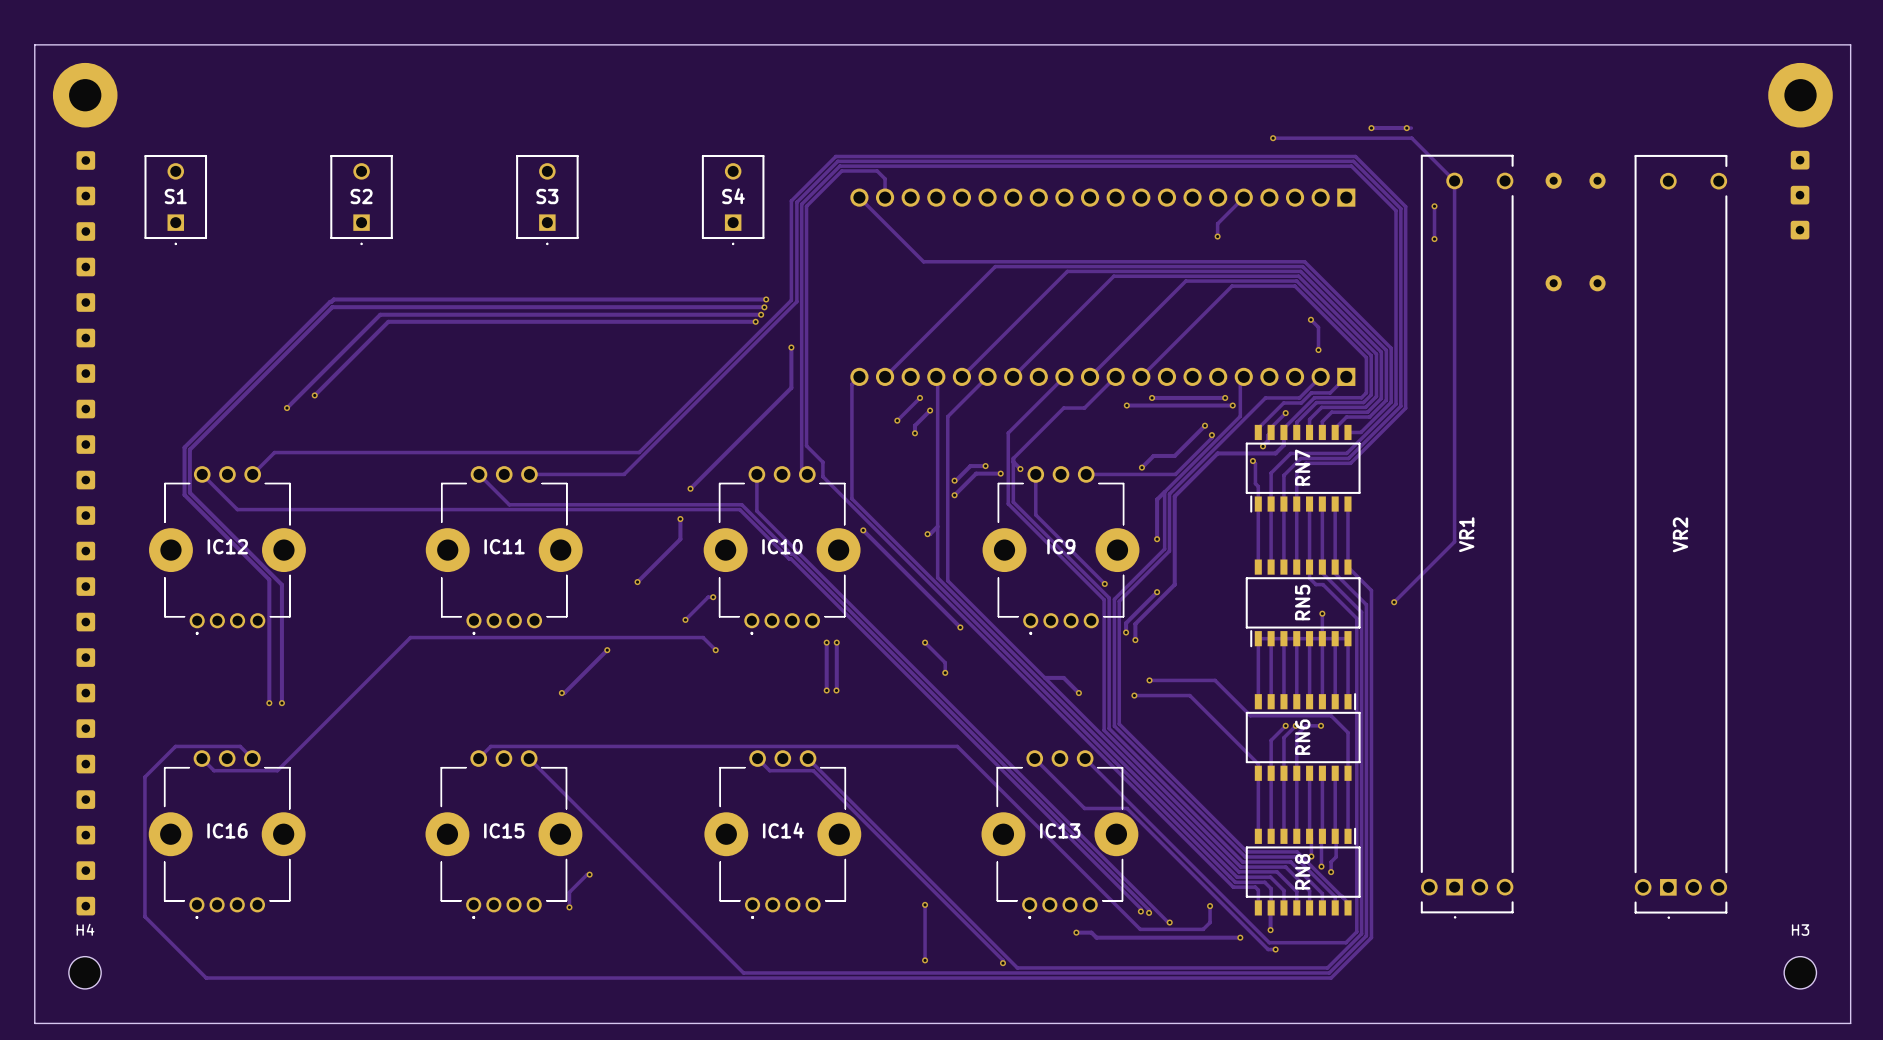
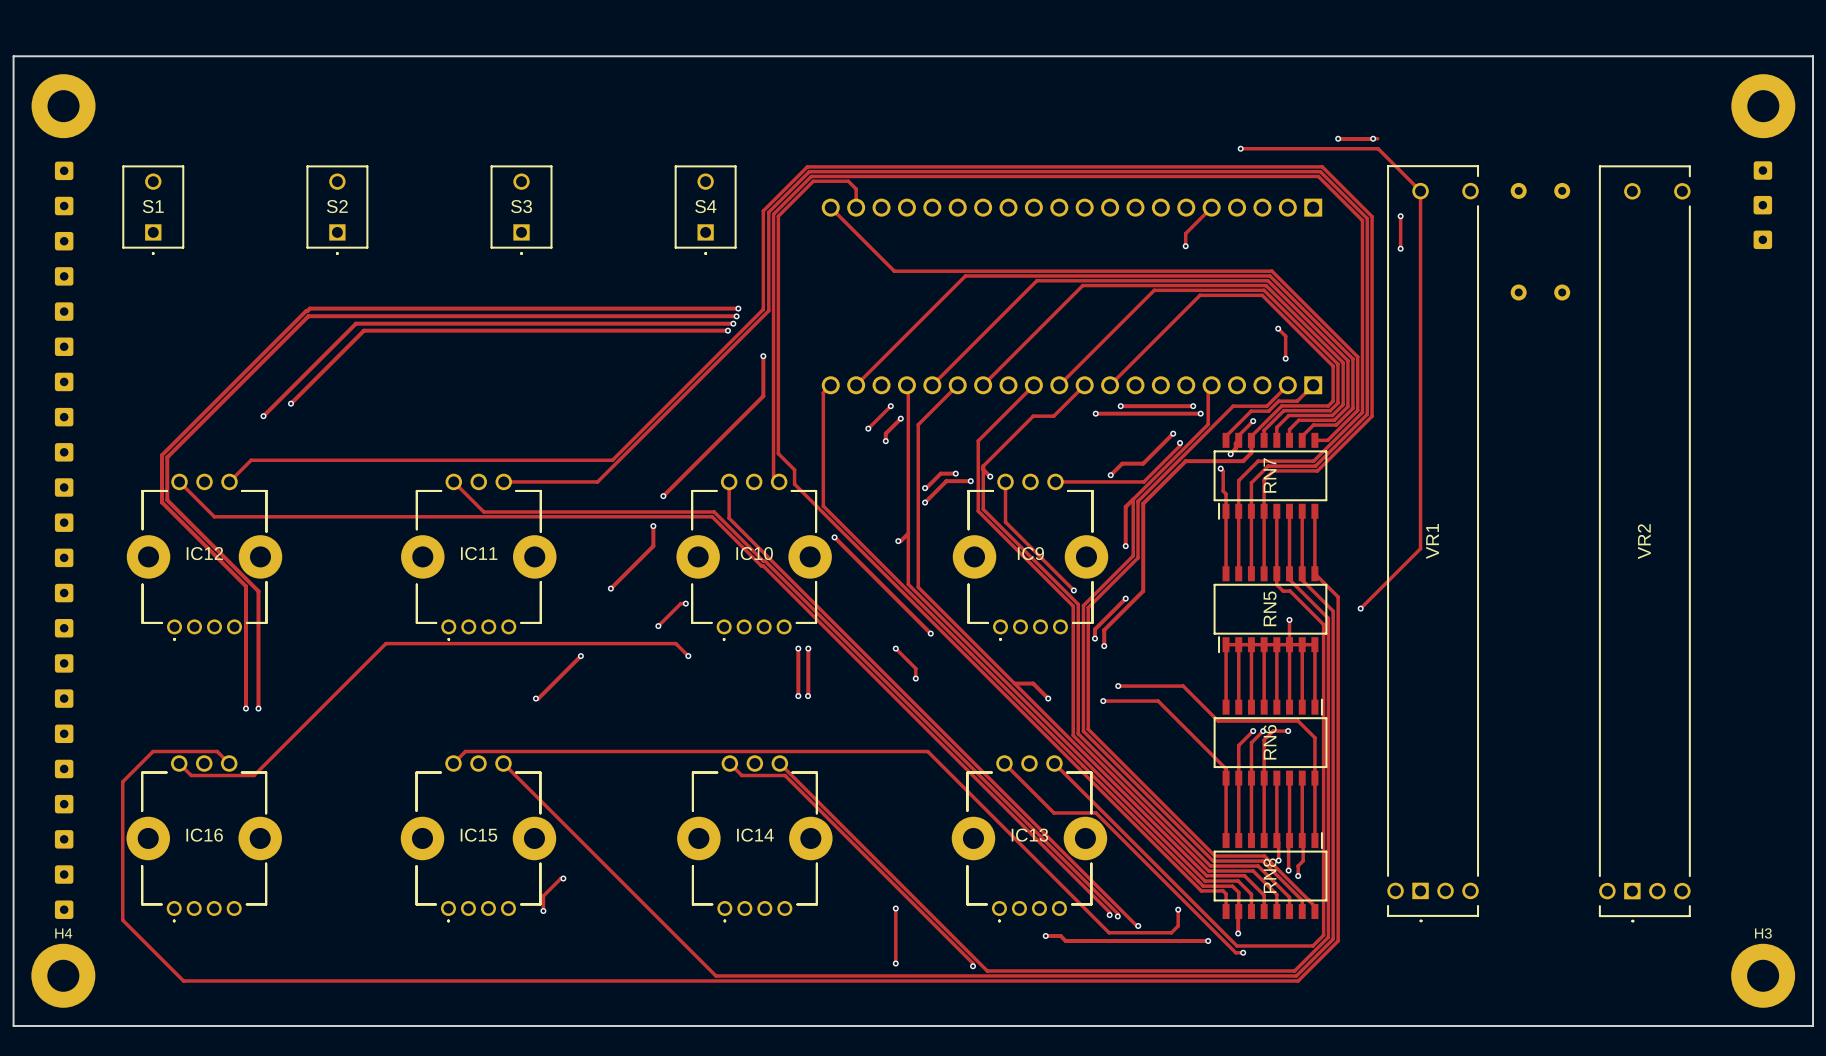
H4 footprint: [68, 956, 102, 989] -> [31, 943, 96, 1008]
H3 footprint: [1784, 956, 1817, 989] -> [1731, 943, 1796, 1008]

